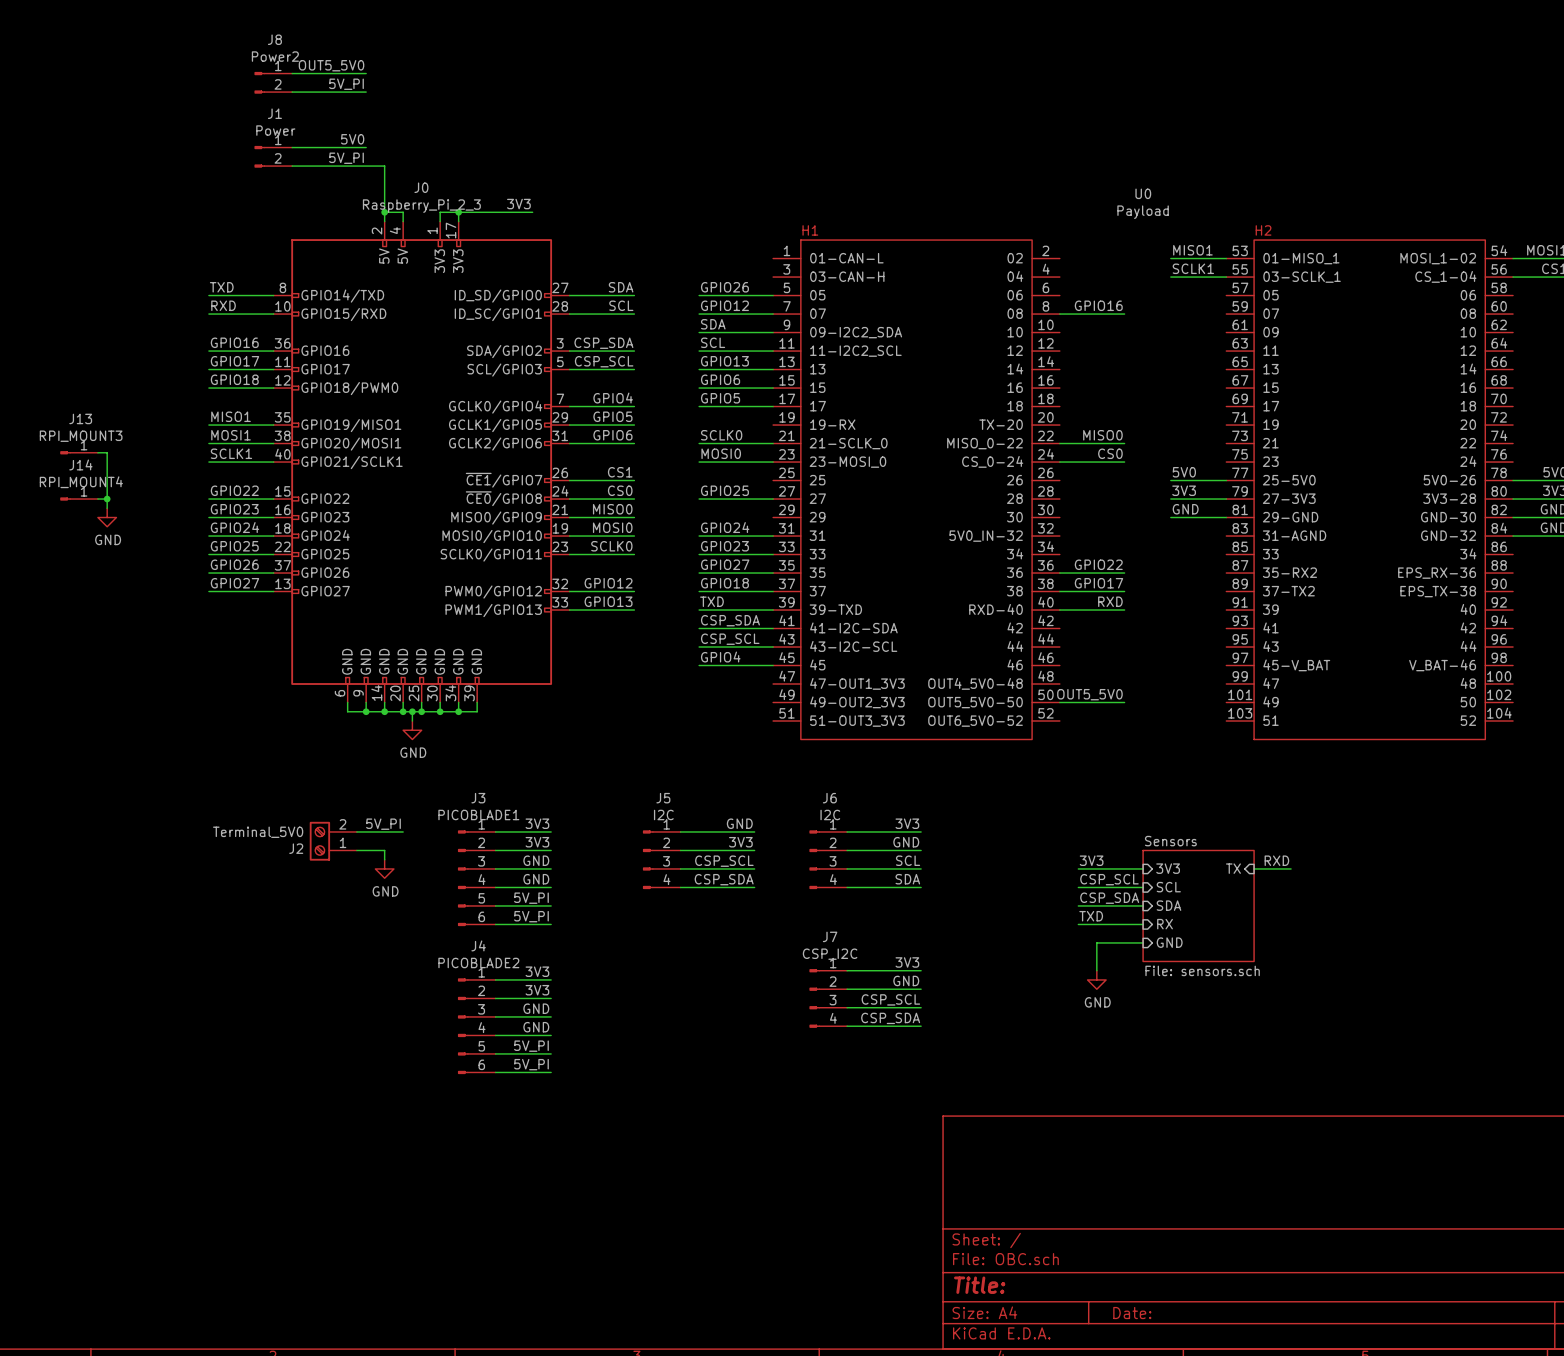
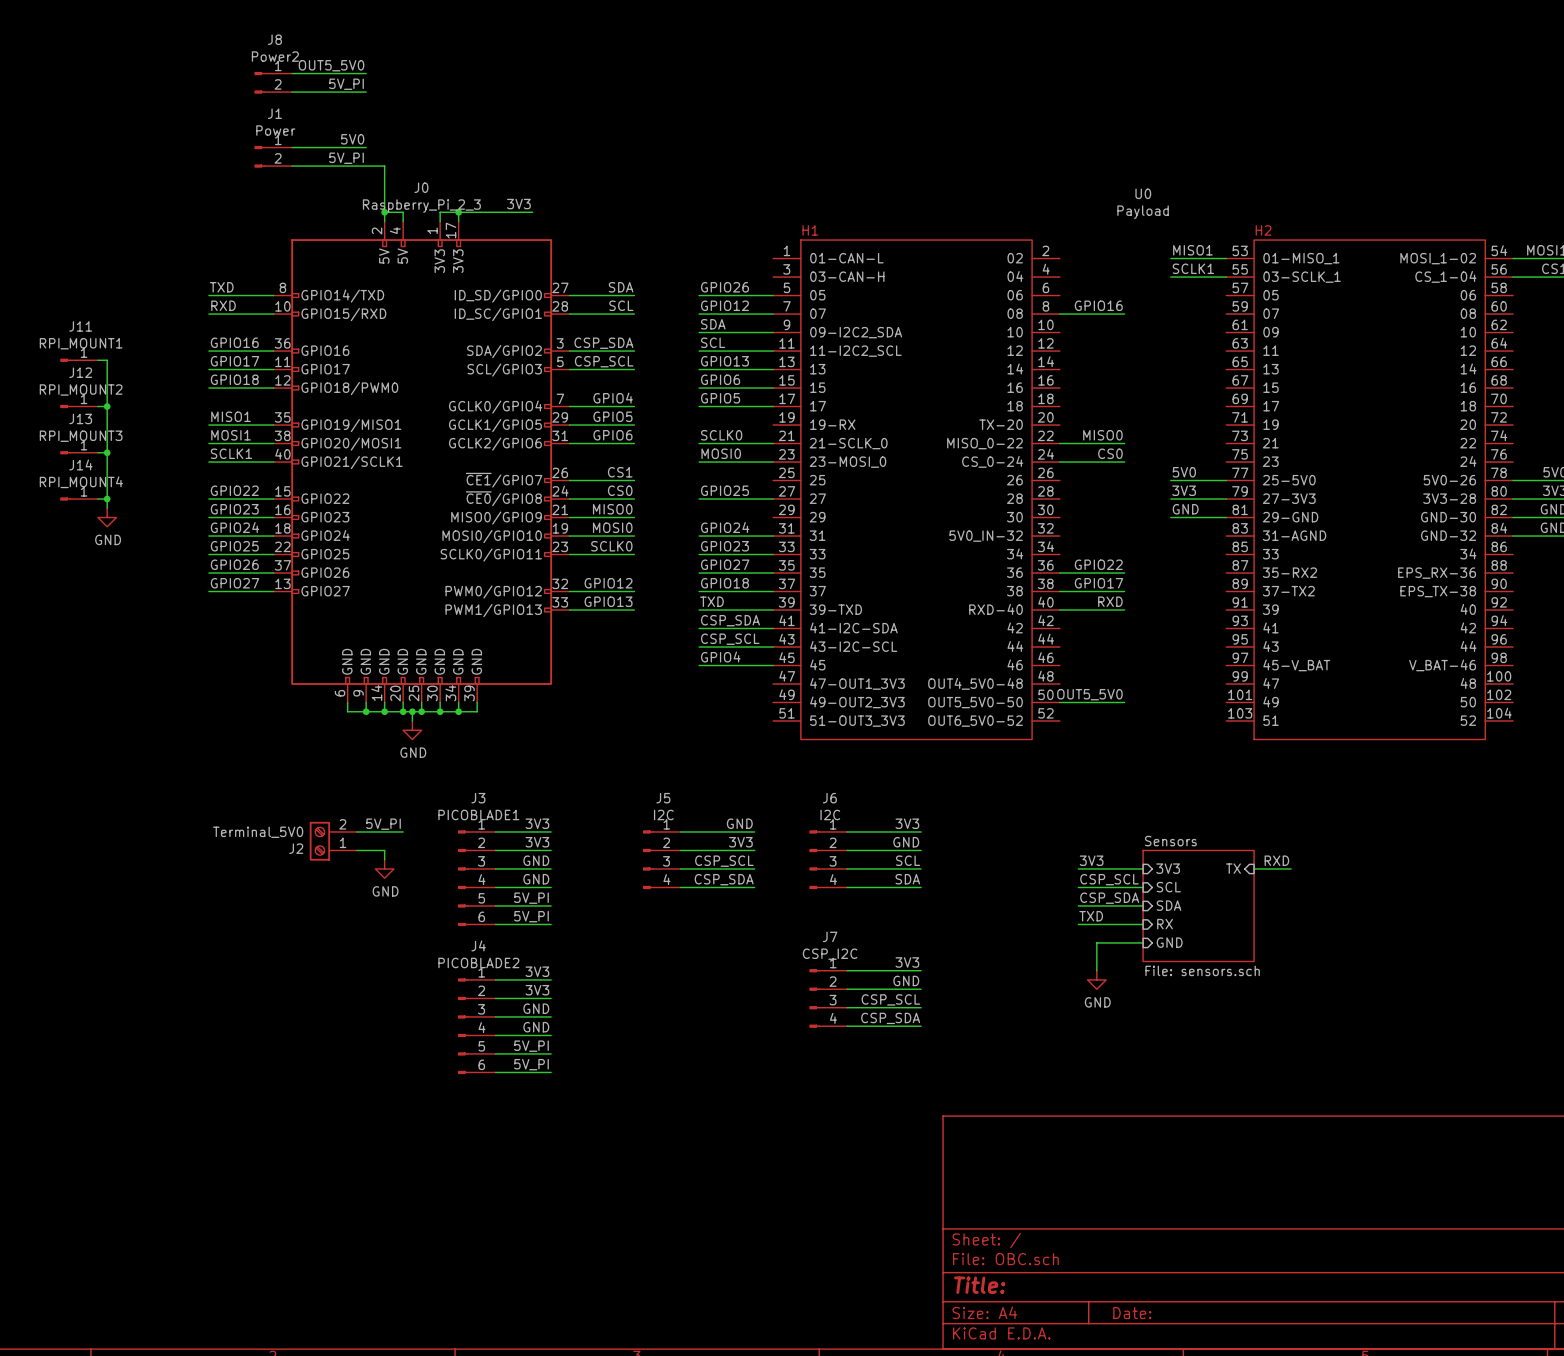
J11: none -> RPI_MOUNT1 (79, 360)
wire: none -> (97, 360) (107, 360) (107, 452)
J12: none -> RPI_MOUNT2 (79, 406)
wire: none -> (97, 406) (107, 406)
junction: none -> (107, 406)
junction: none -> (107, 452)

